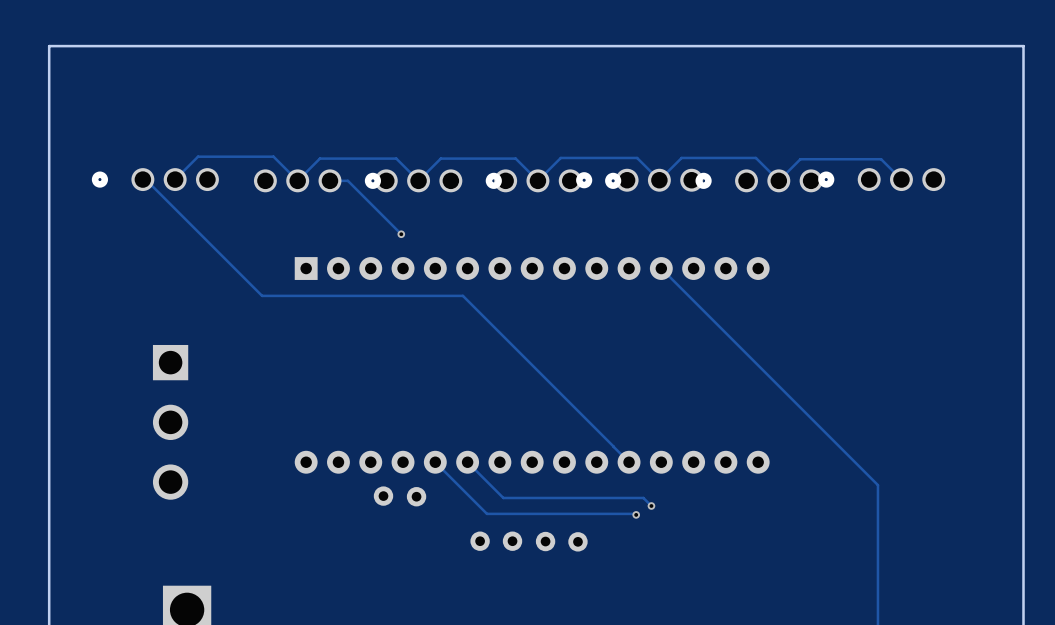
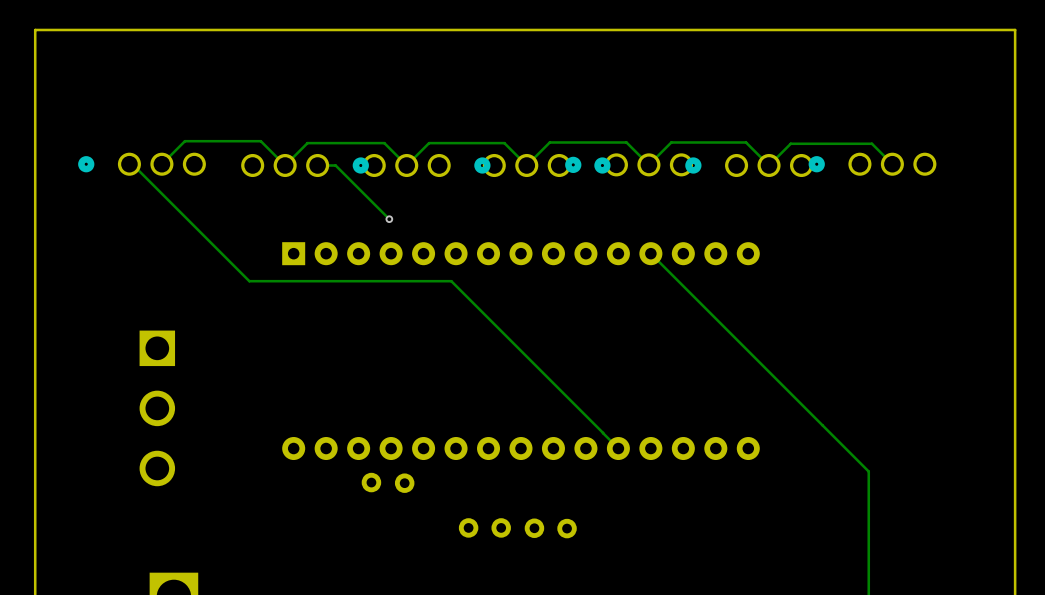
track: (435, 462) (486, 513) (636, 514) -> none
track: (467, 462) (503, 497) (643, 497) (651, 506) -> none
via: (651, 506) -> none
via: (636, 514) -> none

